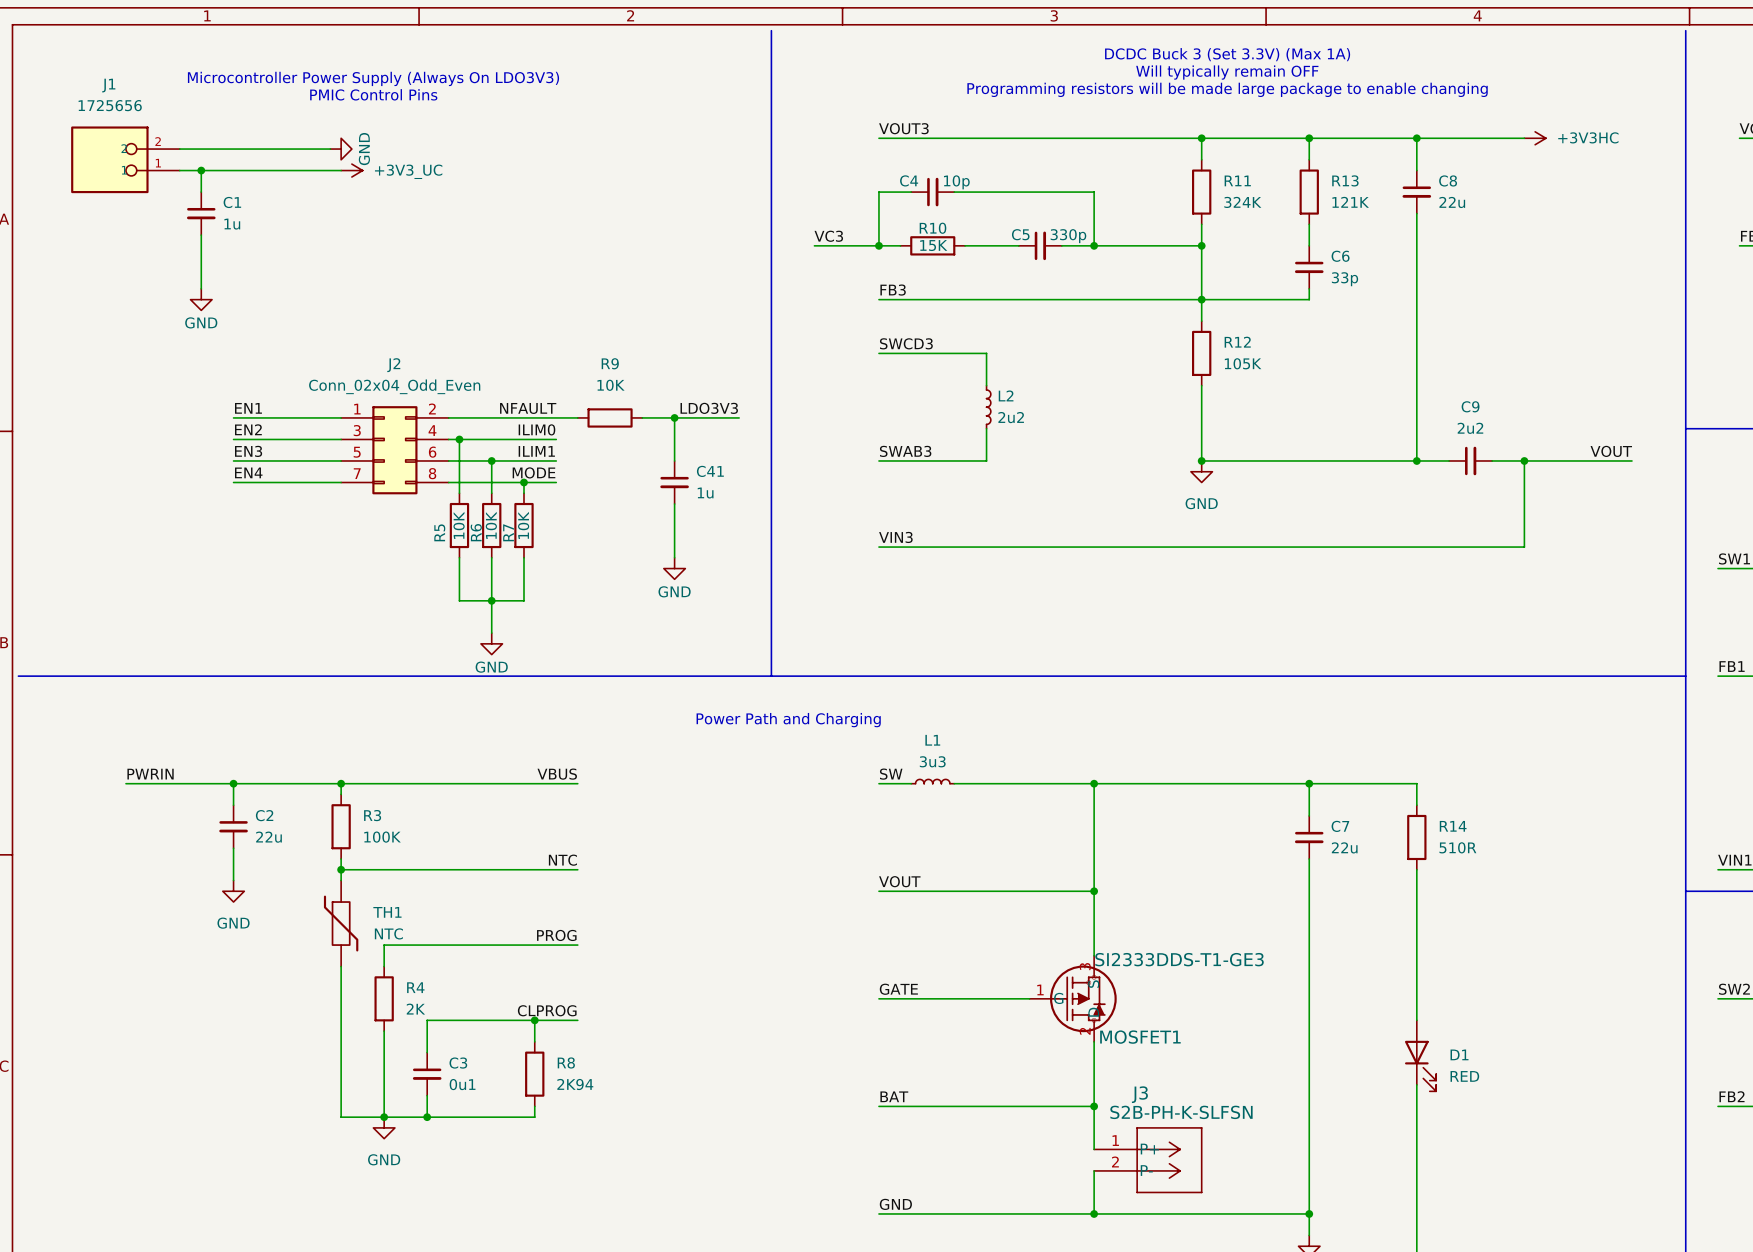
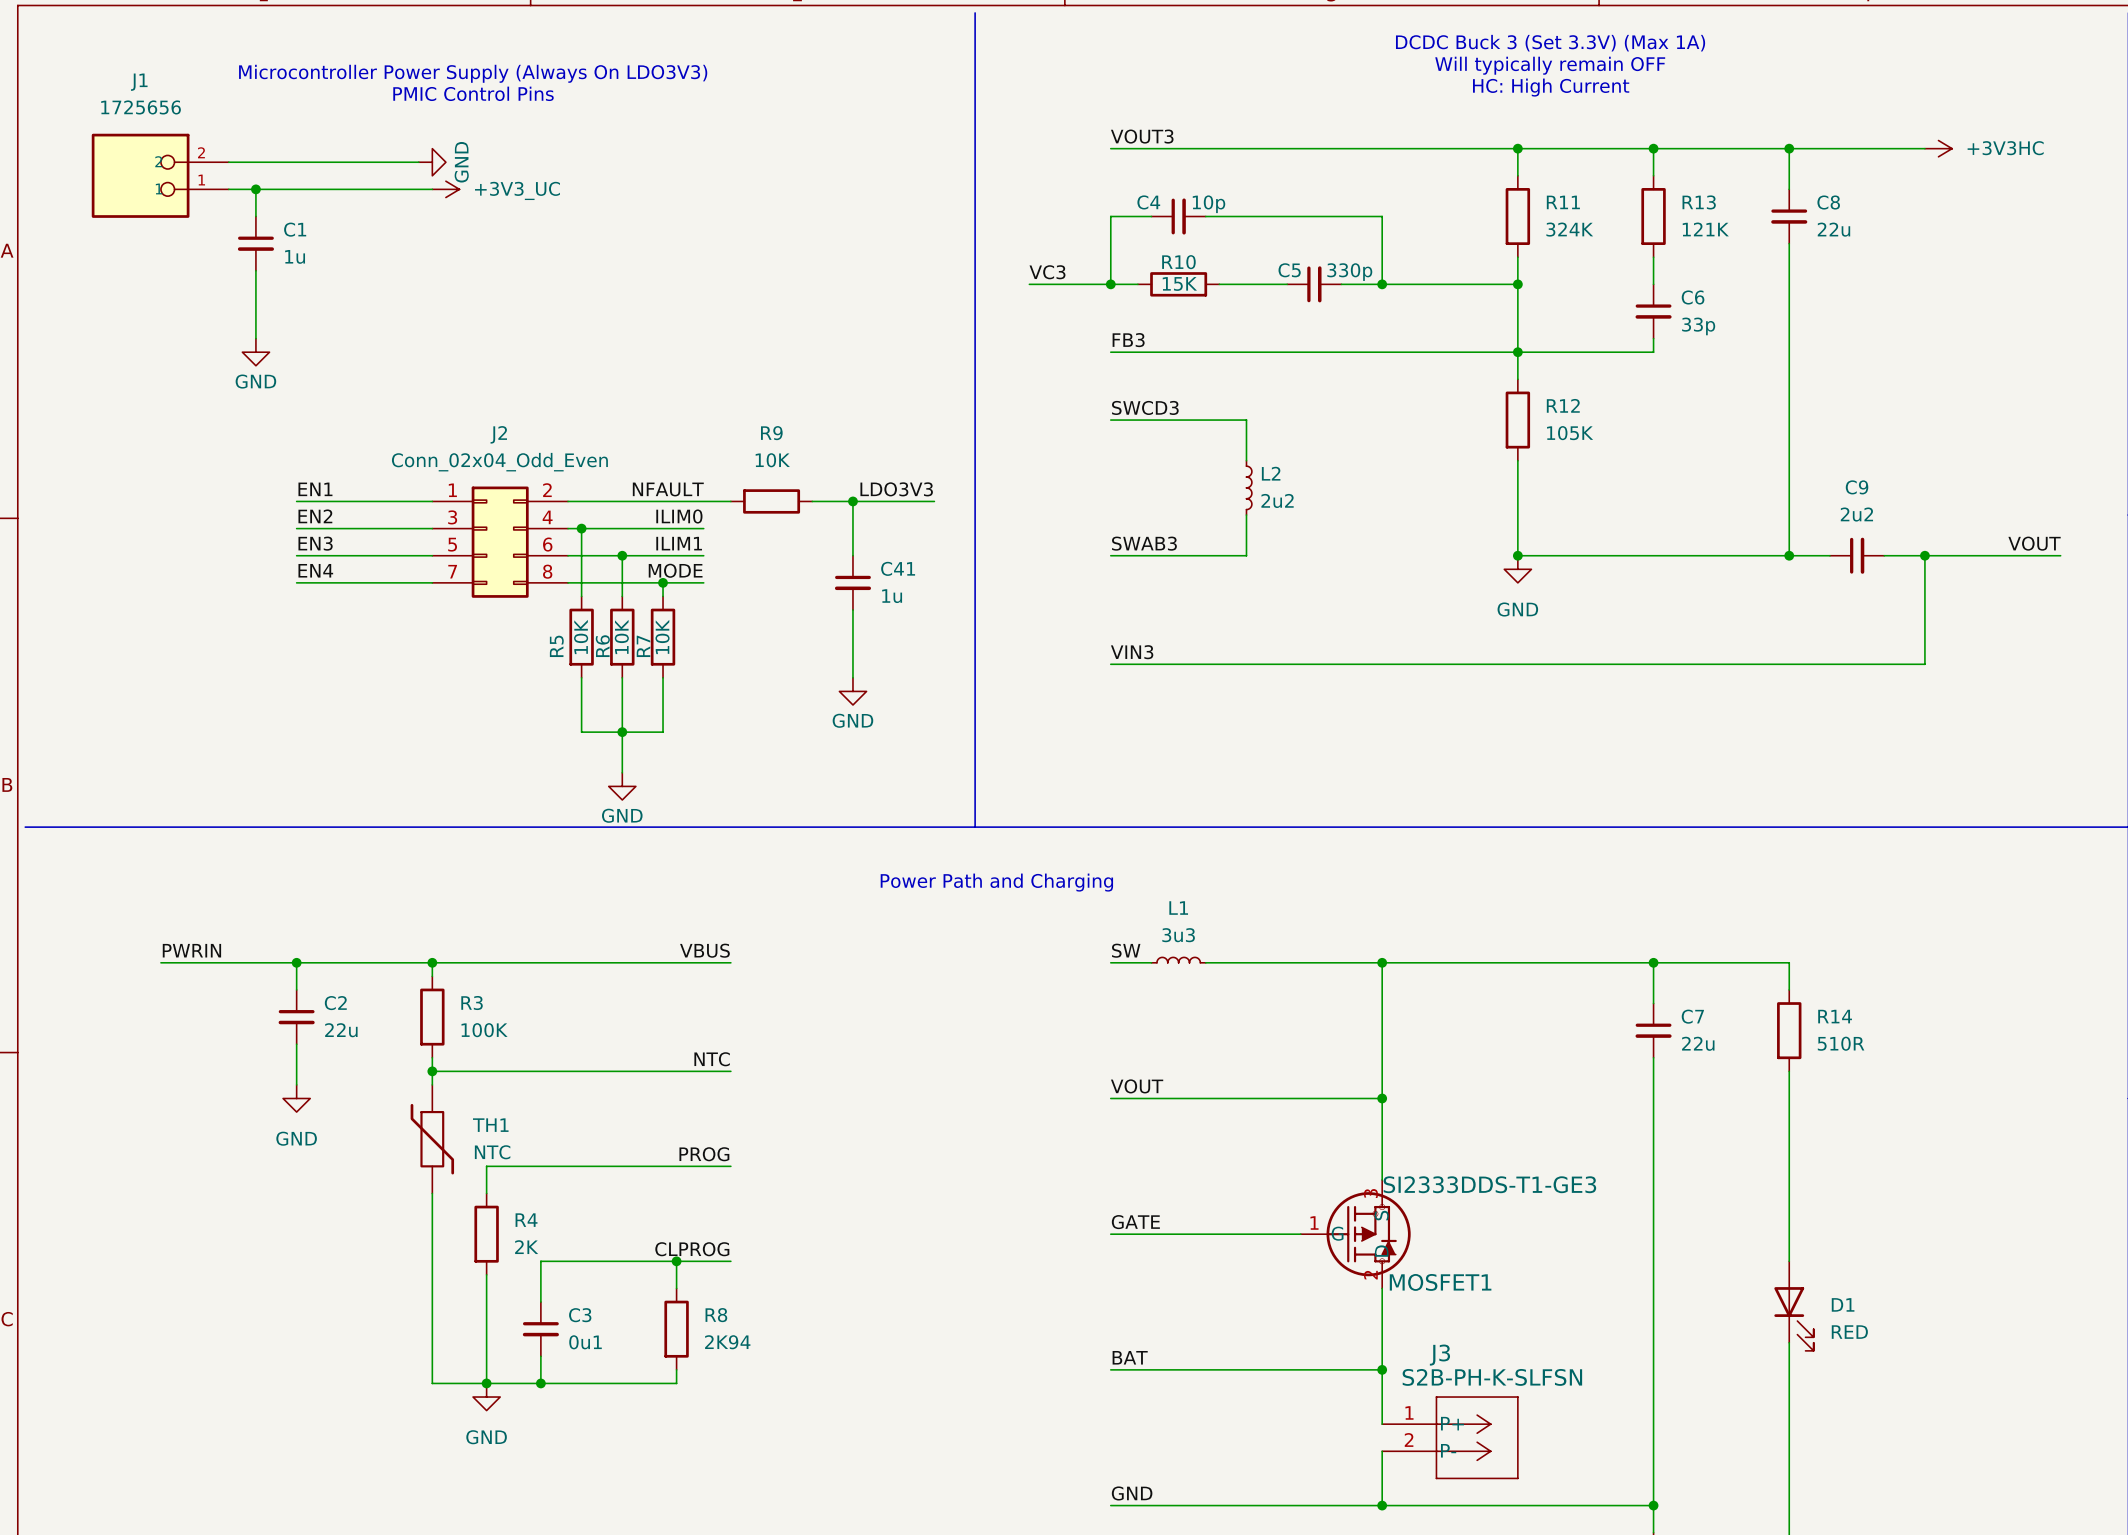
text: Programming resistors will be made large package to enable changing (1227, 89) -> HC: High Current (1551, 87)

